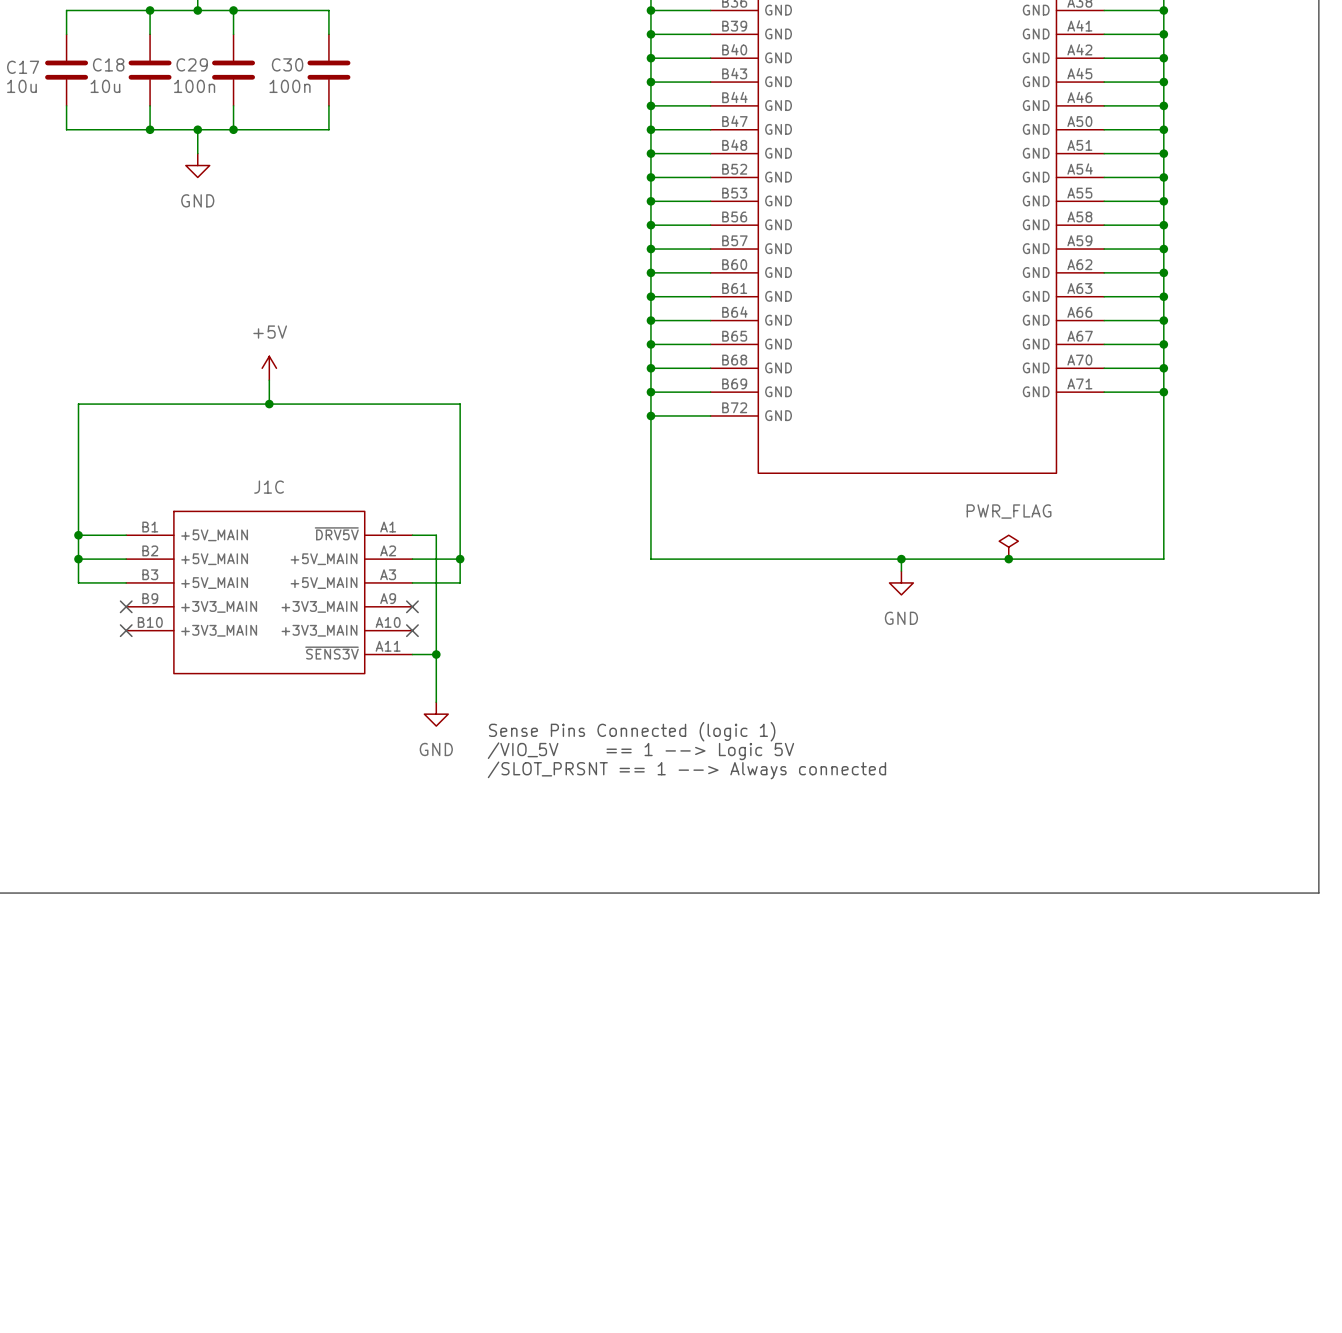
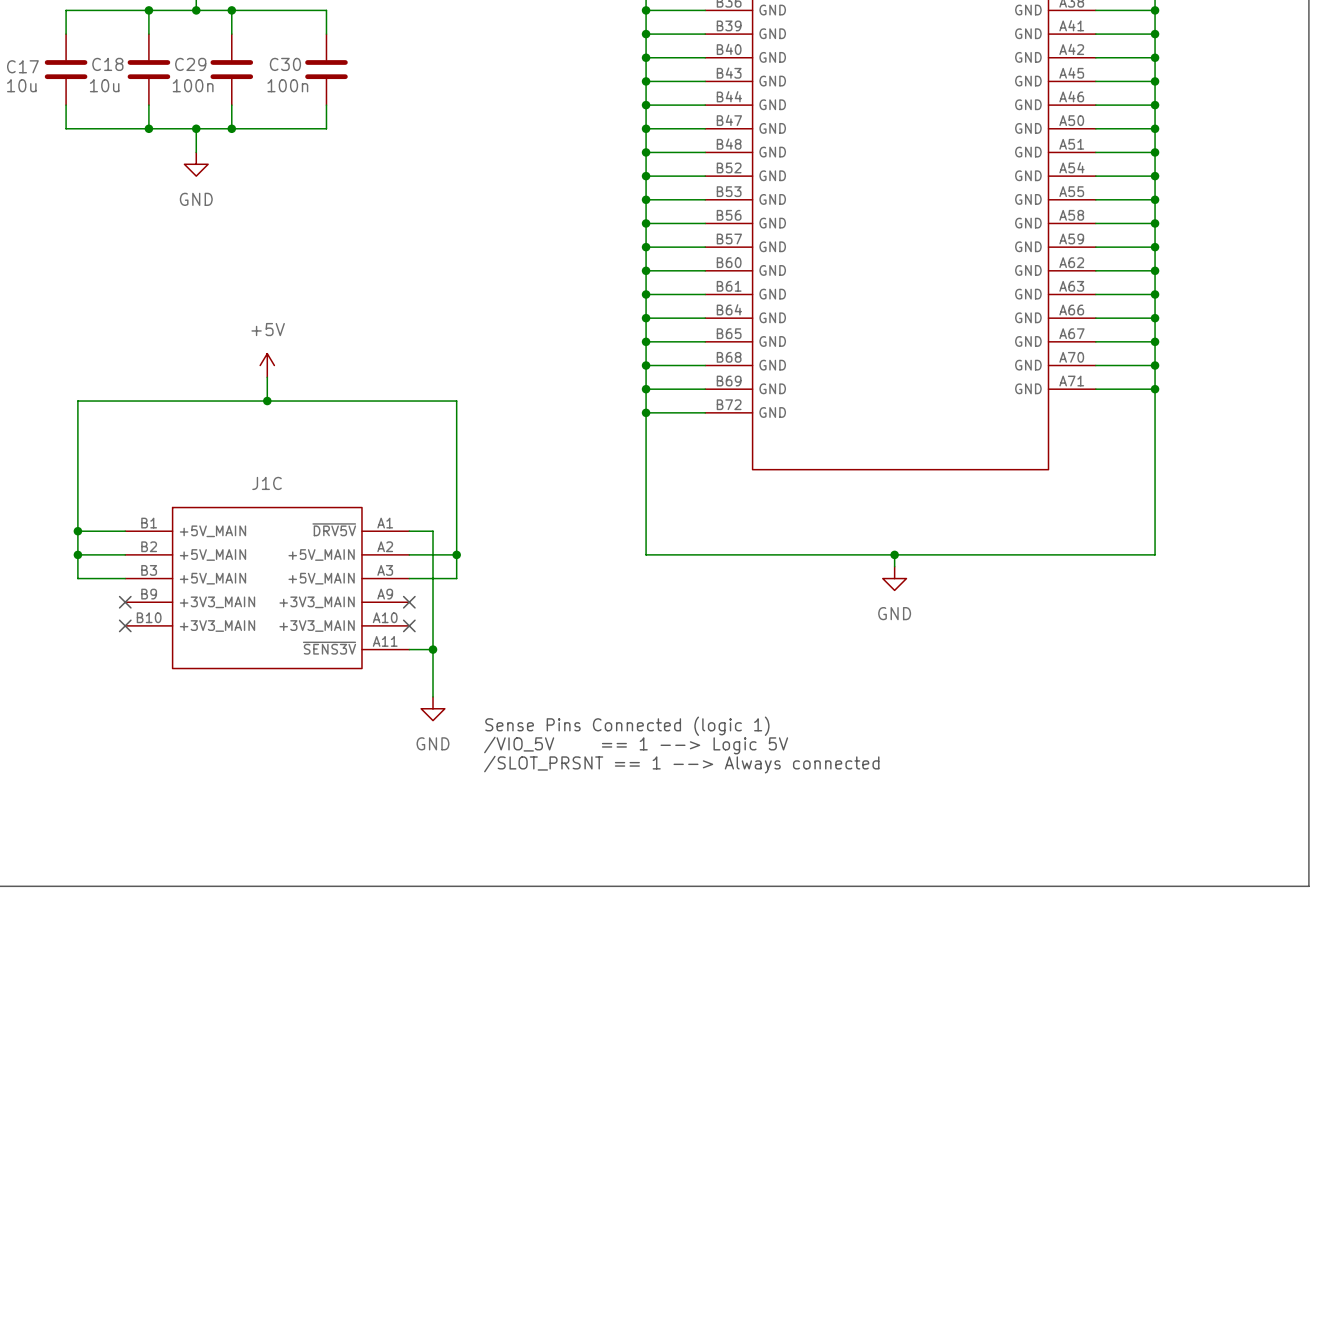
power symbol: PWR_FLAG (1008, 547) -> none
junction: (1008, 559) -> none

